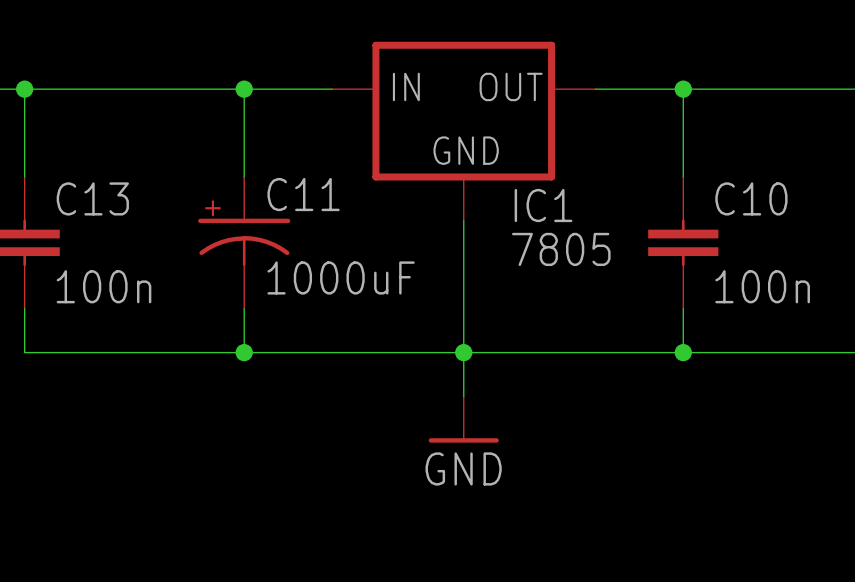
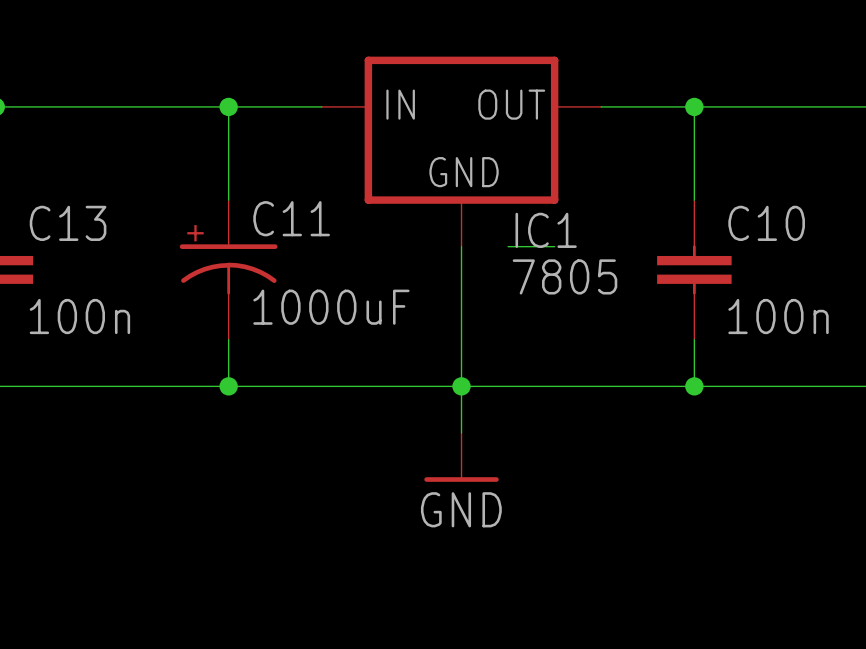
wire: none -> (508, 246) (554, 246)

